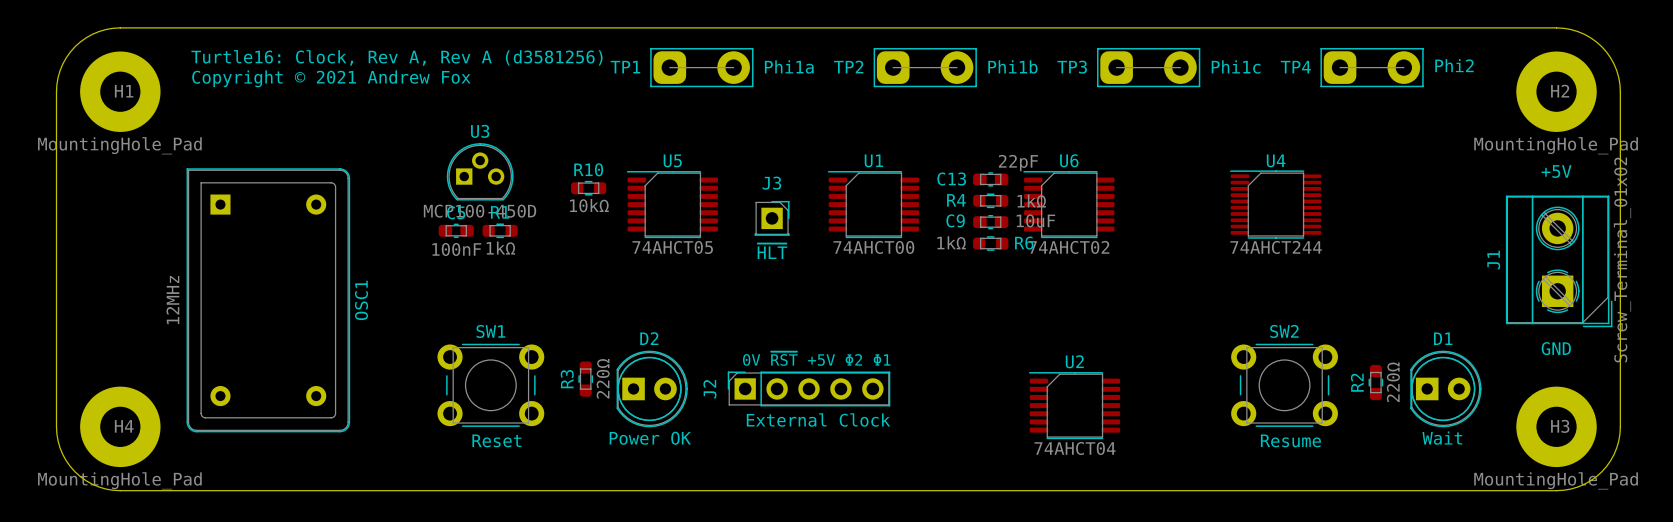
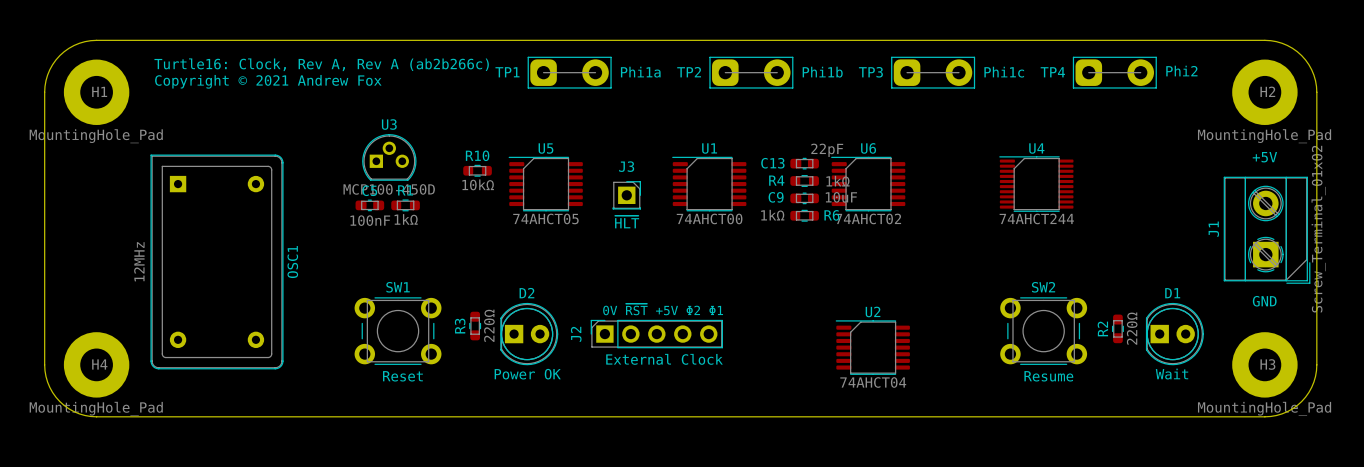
text: Turtle16: Clock, Rev A, Rev A (d3581256) (396, 57) -> Turtle16: Clock, Rev A, Rev A (ab2b266c) (321, 64)

